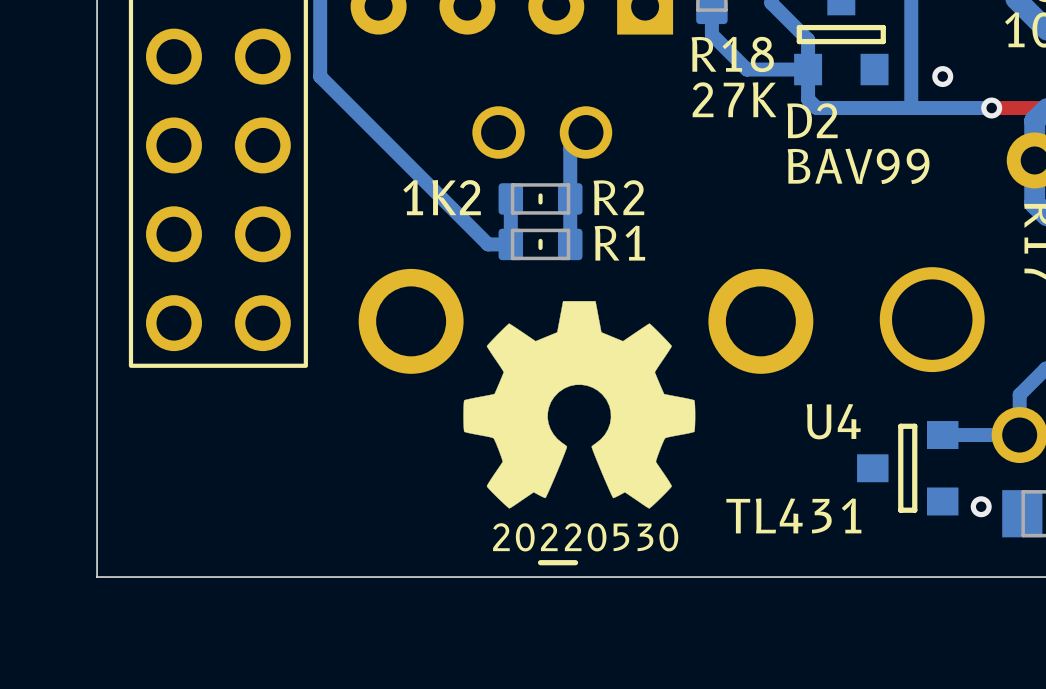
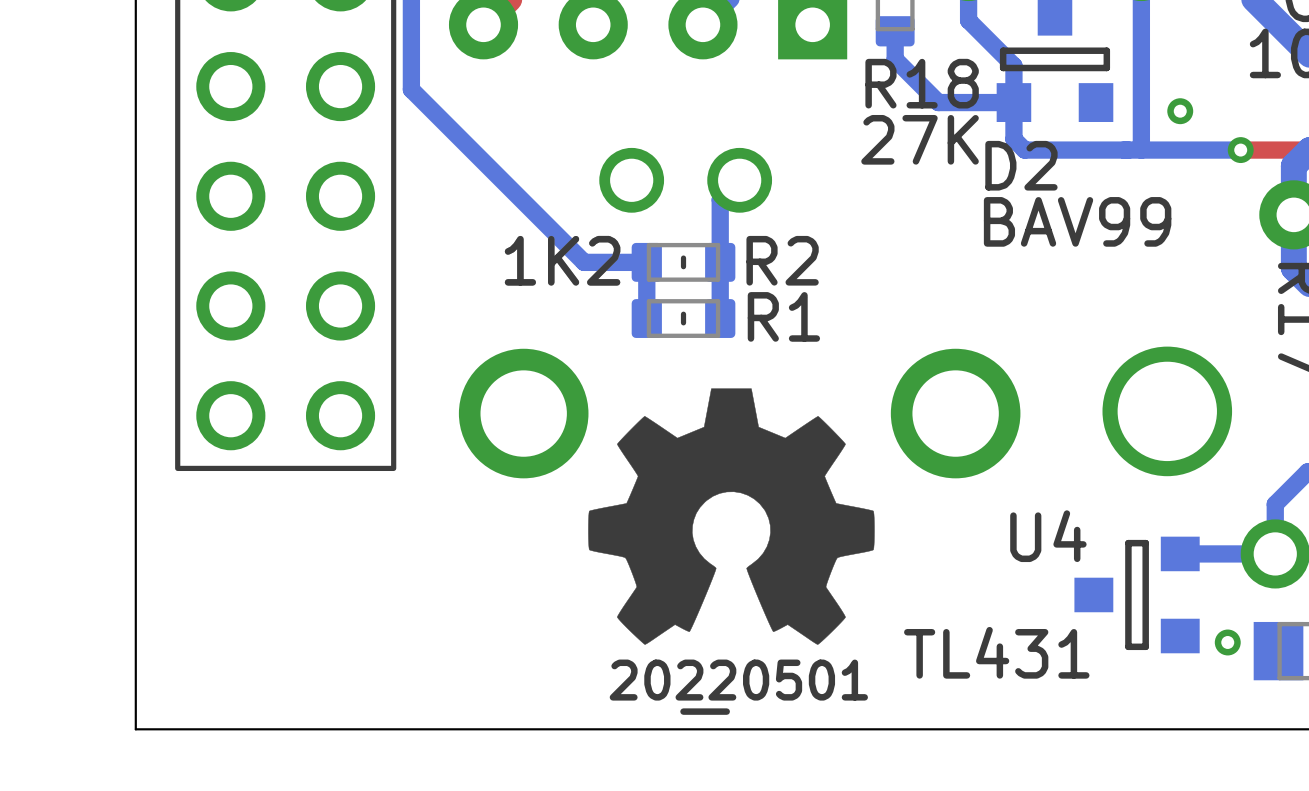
bottom track: (320, 59) (320, 76) (488, 244) (510, 244) -> (411, 89) (584, 262) (646, 262)
drawing shape: [493, 523, 679, 566] -> [609, 659, 868, 715]

